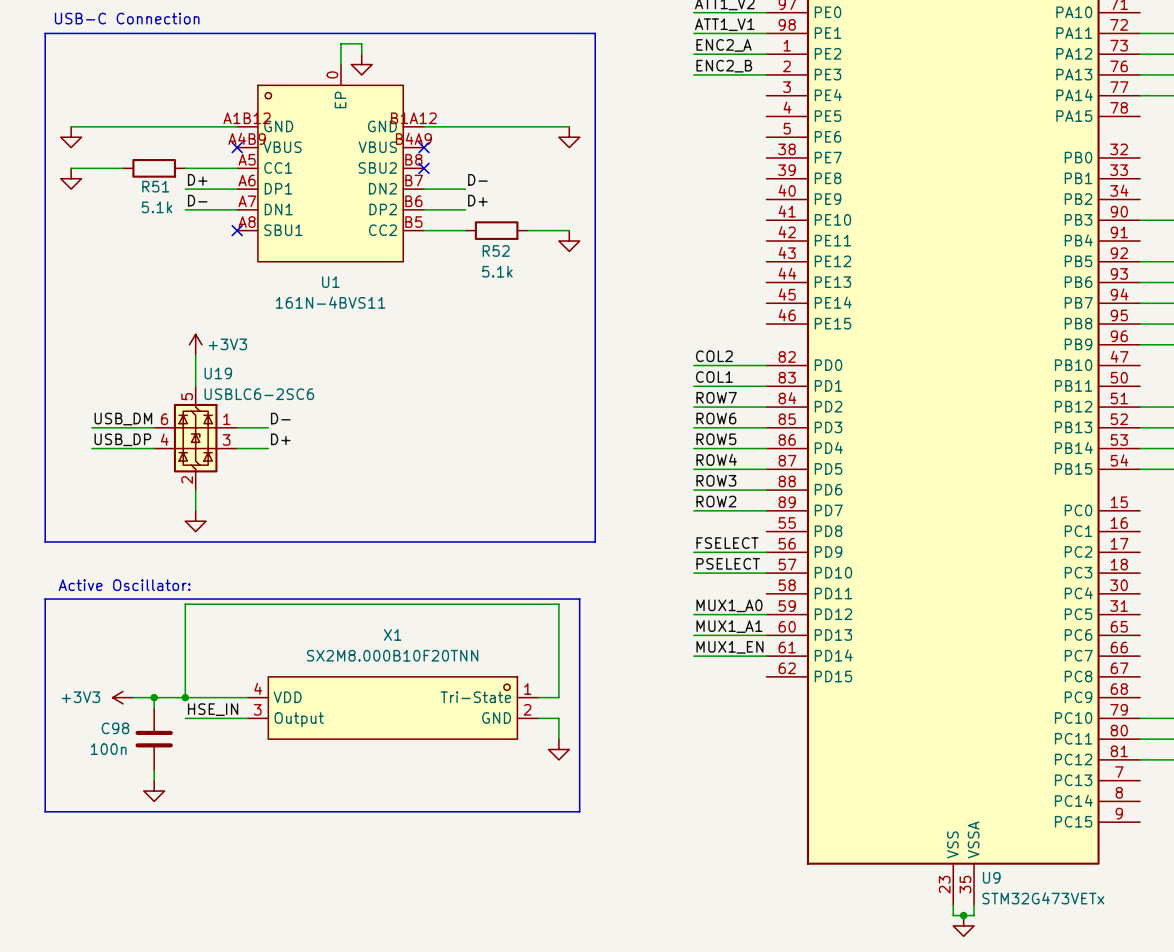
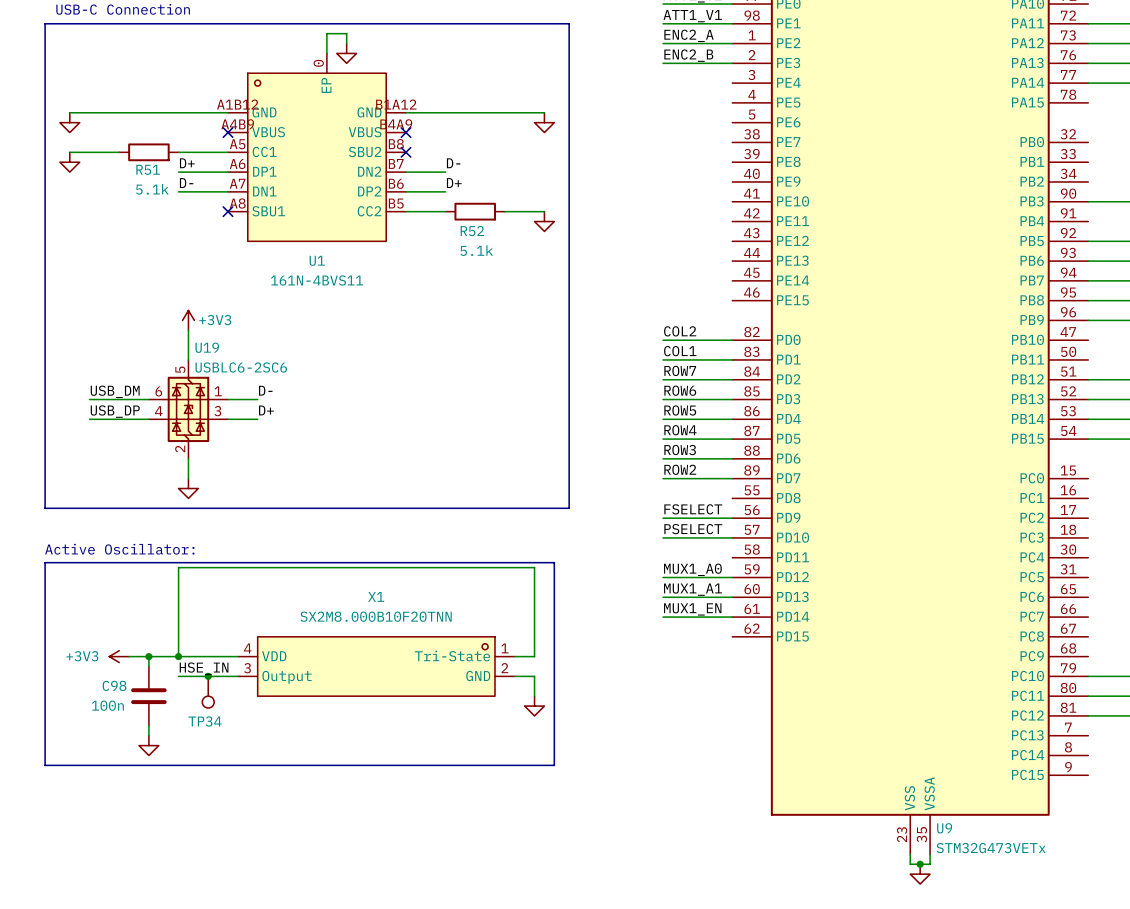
junction: none -> (208, 676)
TP34: none -> (208, 692)

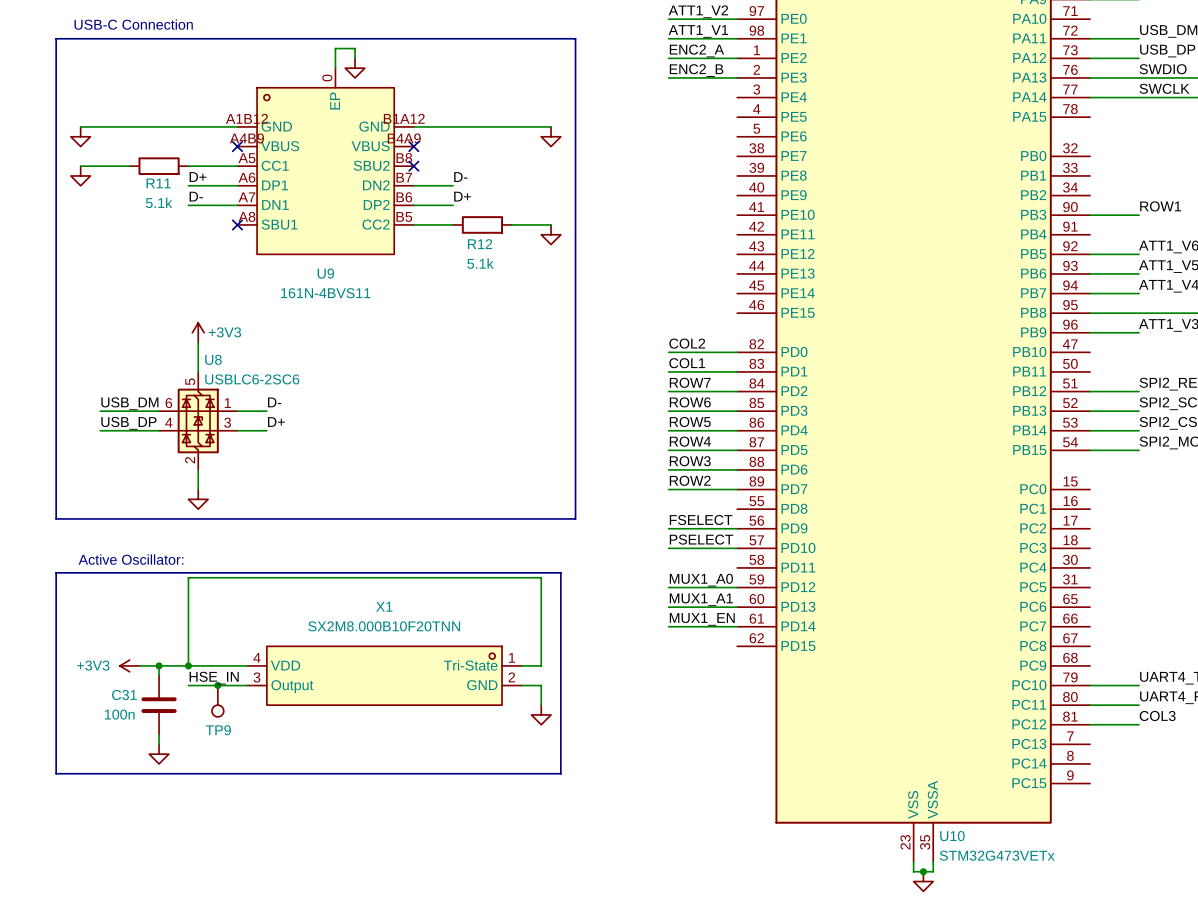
R51 name: R51 (148, 169) -> R11 (158, 183)
R52 name: R52 (472, 231) -> R12 (480, 244)
U1 name: U1 (317, 260) -> U9 (325, 273)
U19 name: U19 (207, 347) -> U8 (213, 359)
C98 name: C98 (114, 685) -> C31 (124, 694)
TP34 name: TP34 (204, 721) -> TP9 (218, 730)
U9 name: U9 (944, 828) -> U10 (952, 836)

